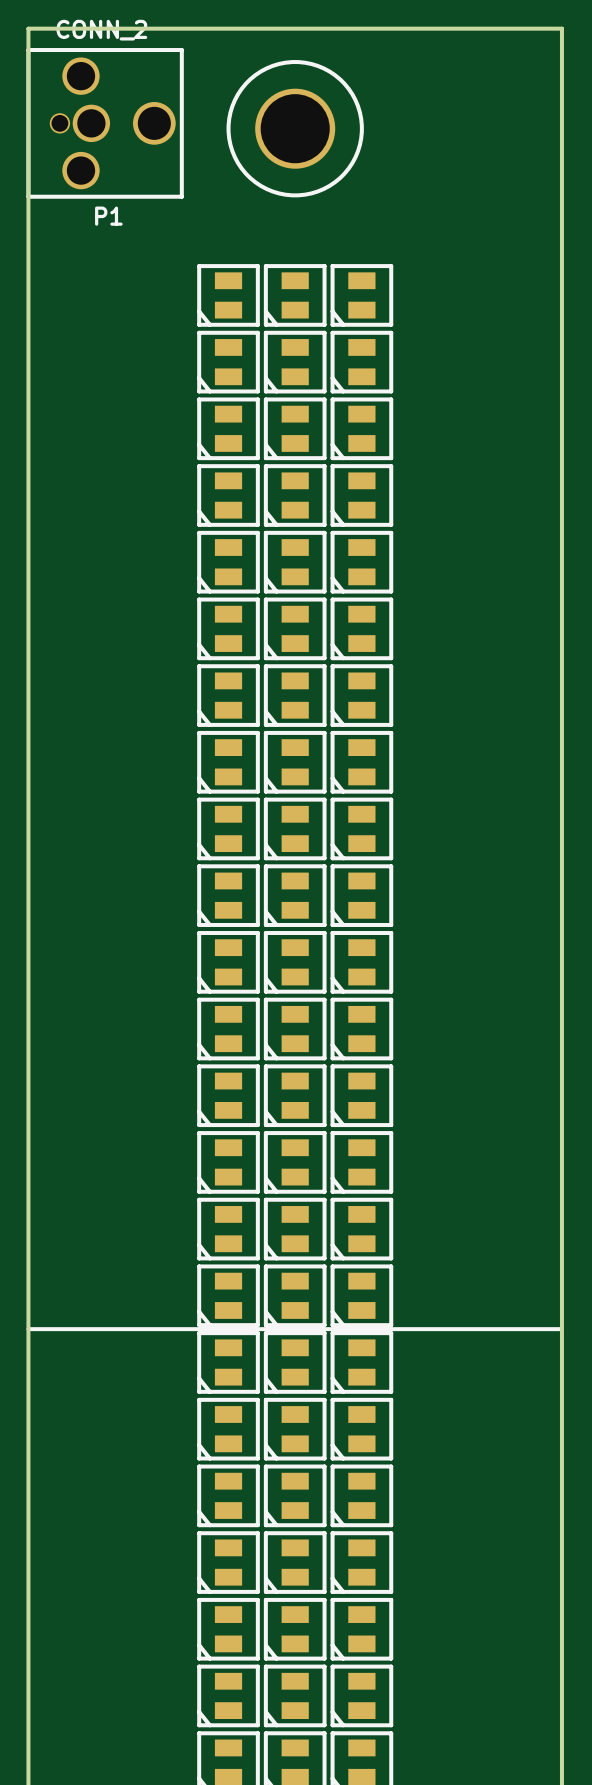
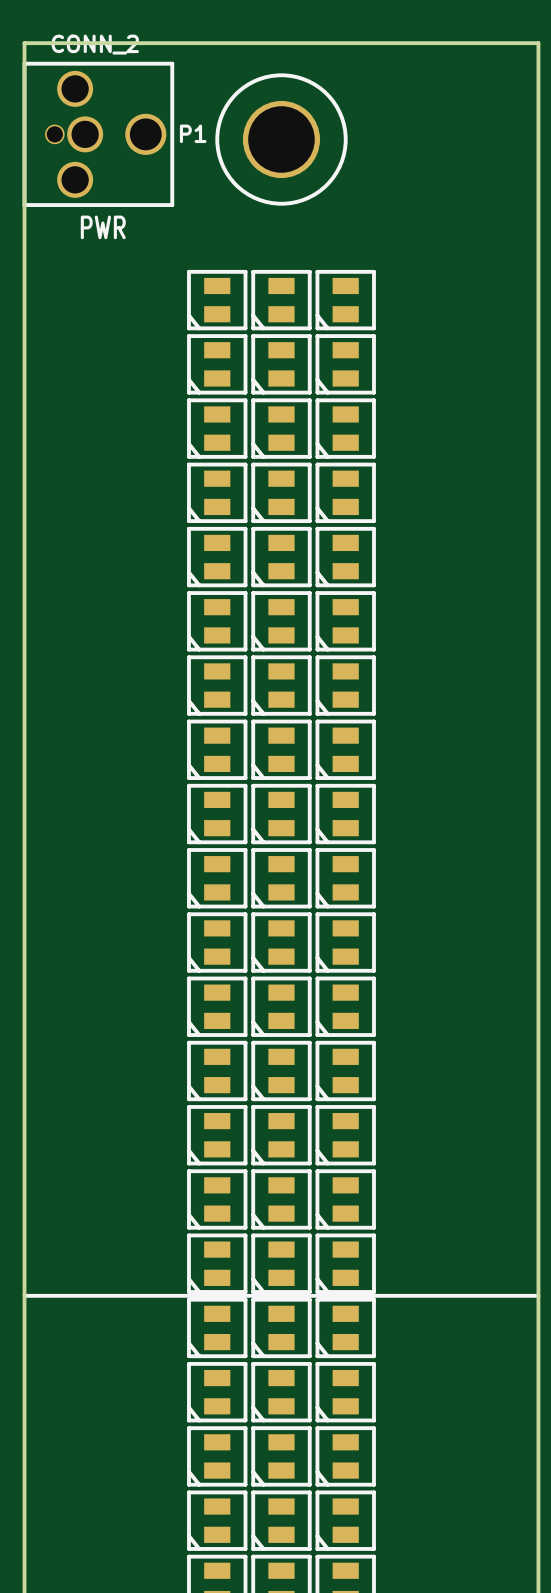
P1 name position: P1 (108, 216) -> P1 (193, 133)
text: none -> PWR (103, 227)

